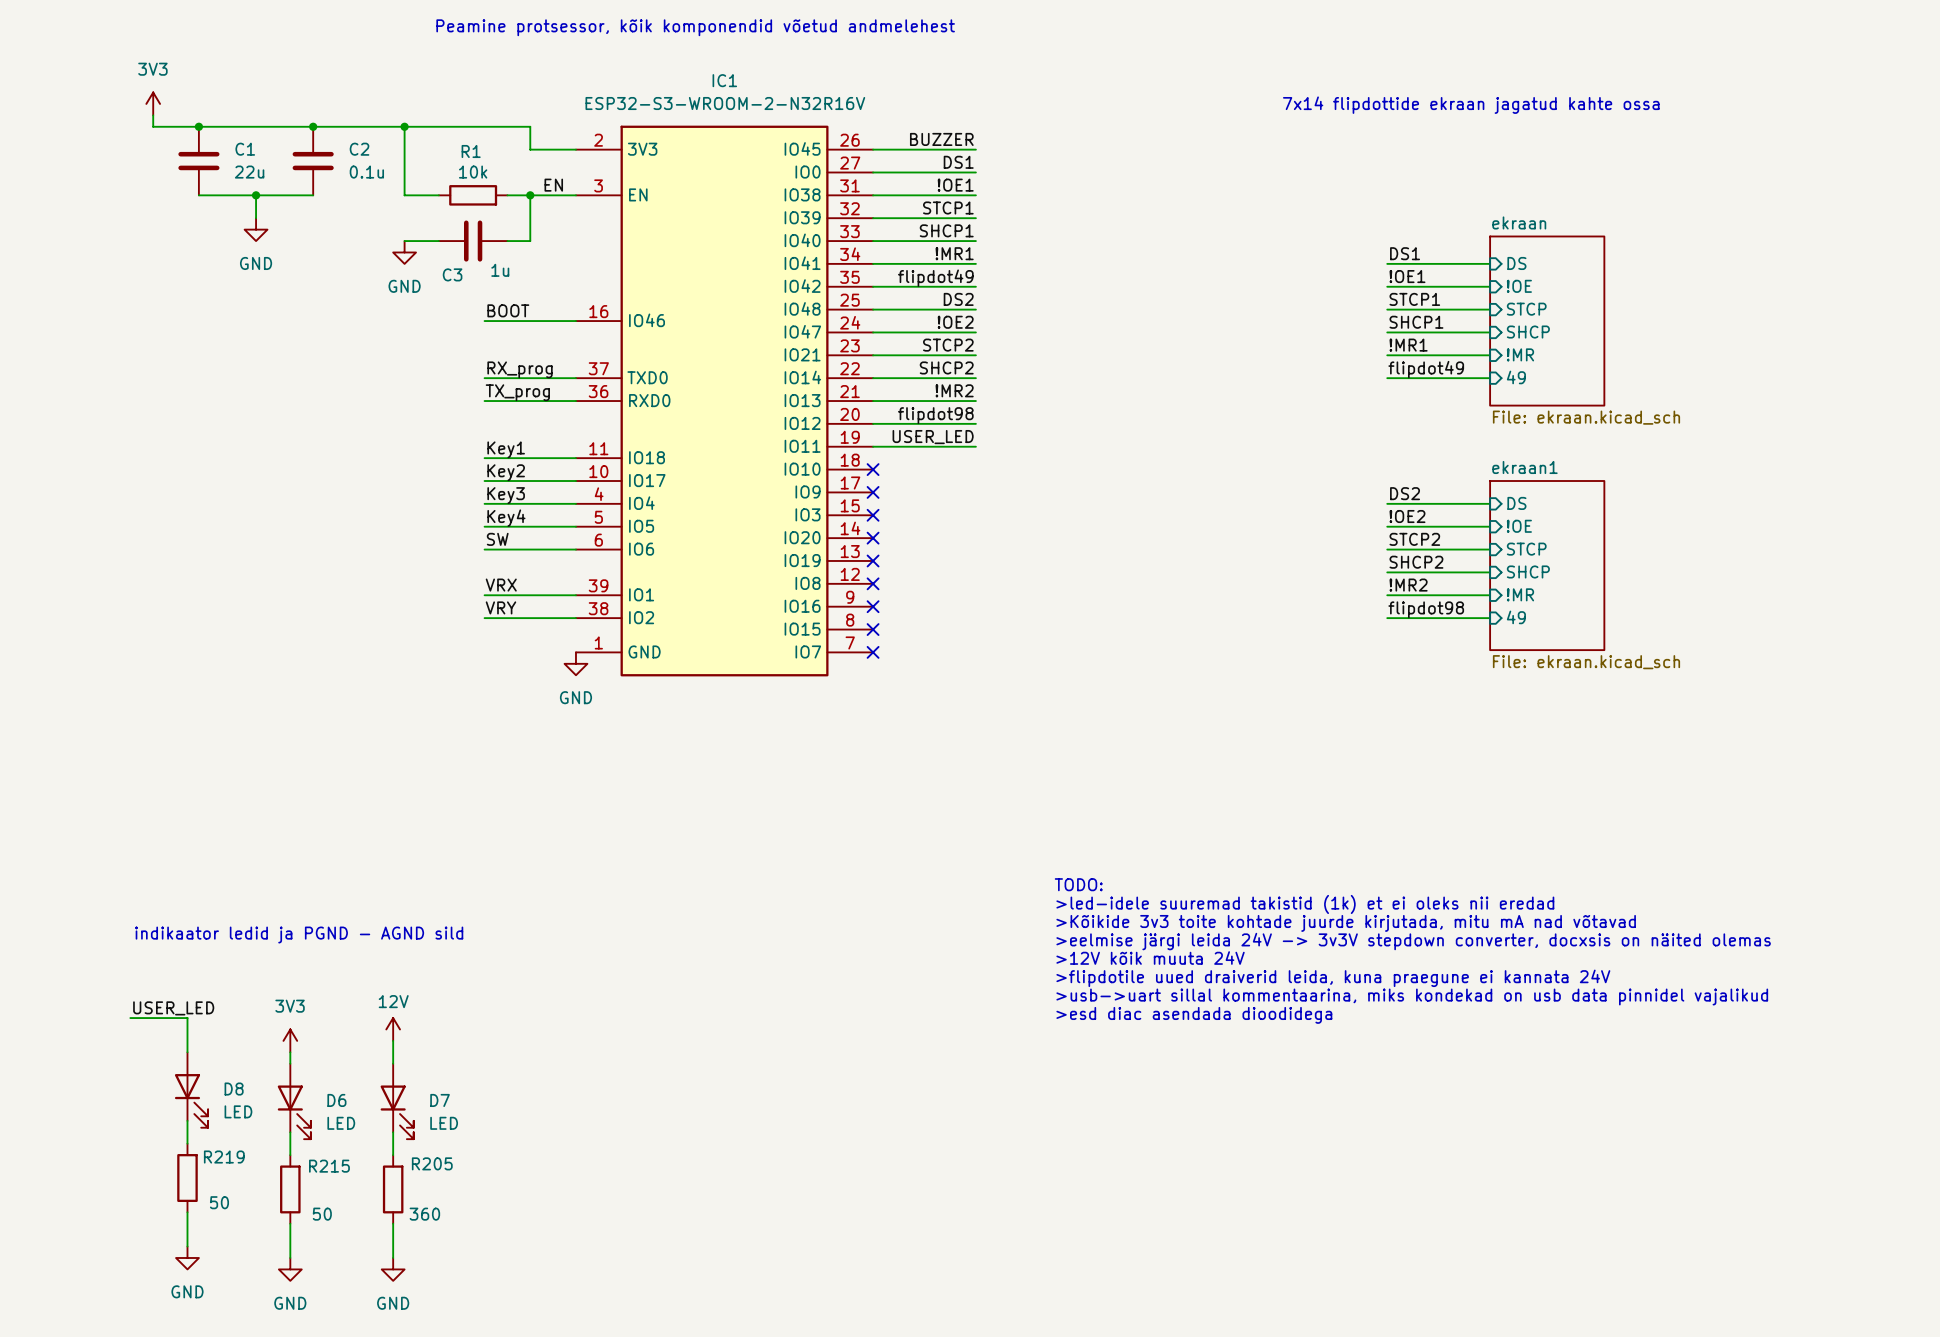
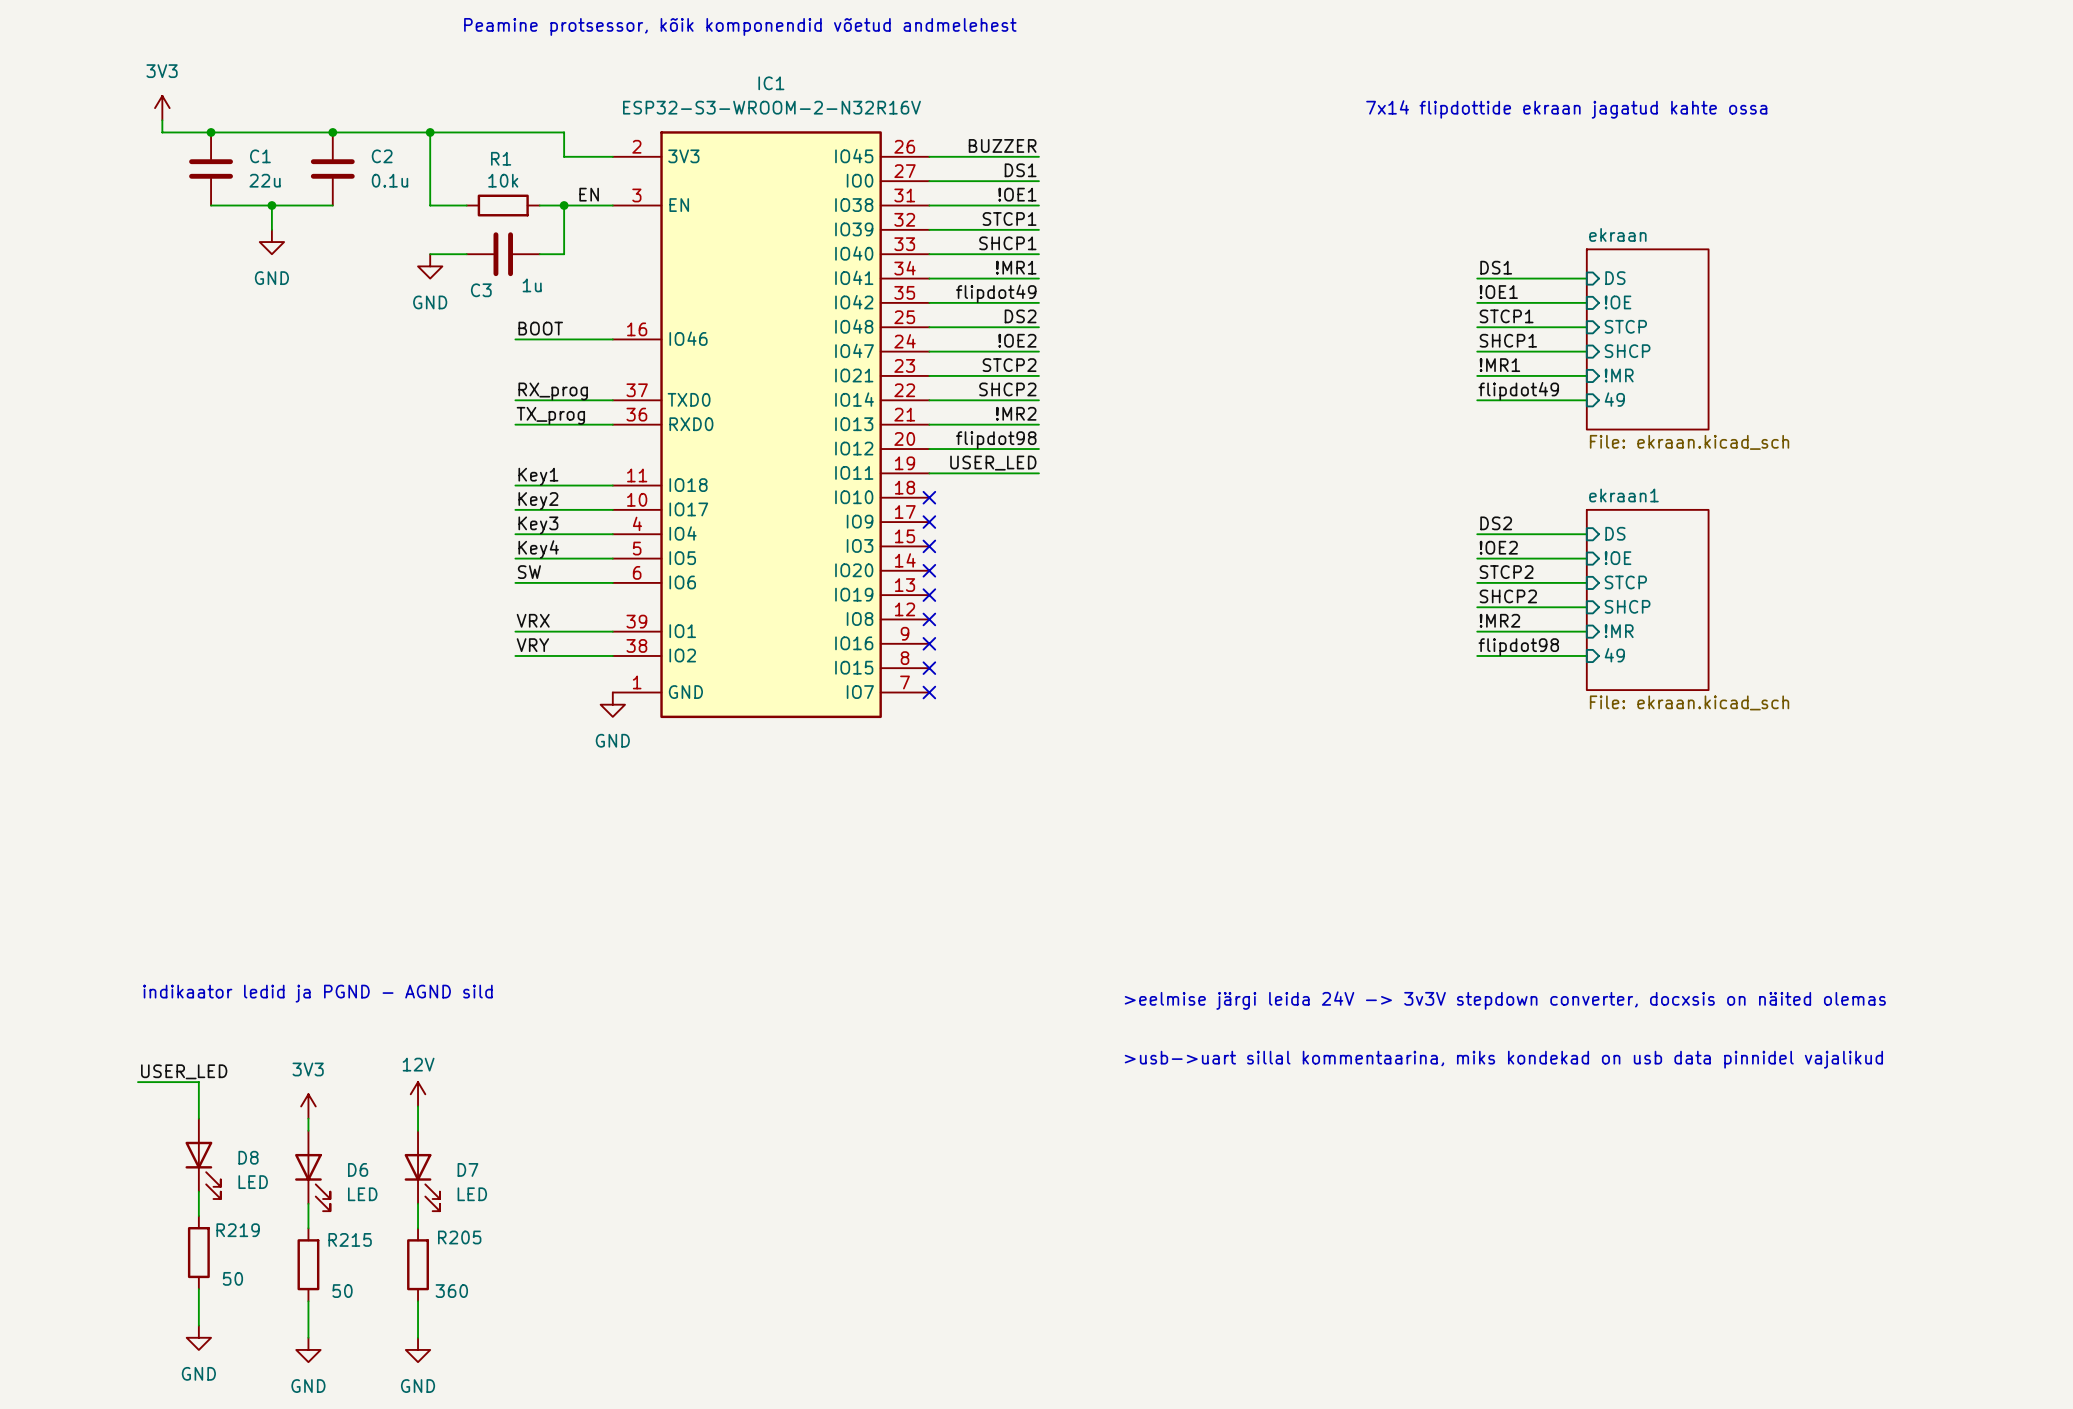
text: TODO: (1078, 884) -> none
text: >led-idele suuremad takistid (1k) et ei oleks nii eredad (1305, 904) -> none
text: >Kõikide 3v3 toite kohtade juurde kirjutada, mitu mA nad võtavad (1346, 923) -> none
text: >12V kõik muuta 24V (1150, 958) -> none
text: >flipdotile uued draiverid leida, kuna praegune ei kannata 24V (1333, 978) -> none
text: >esd diac asendada dioodidega (1194, 1015) -> none

